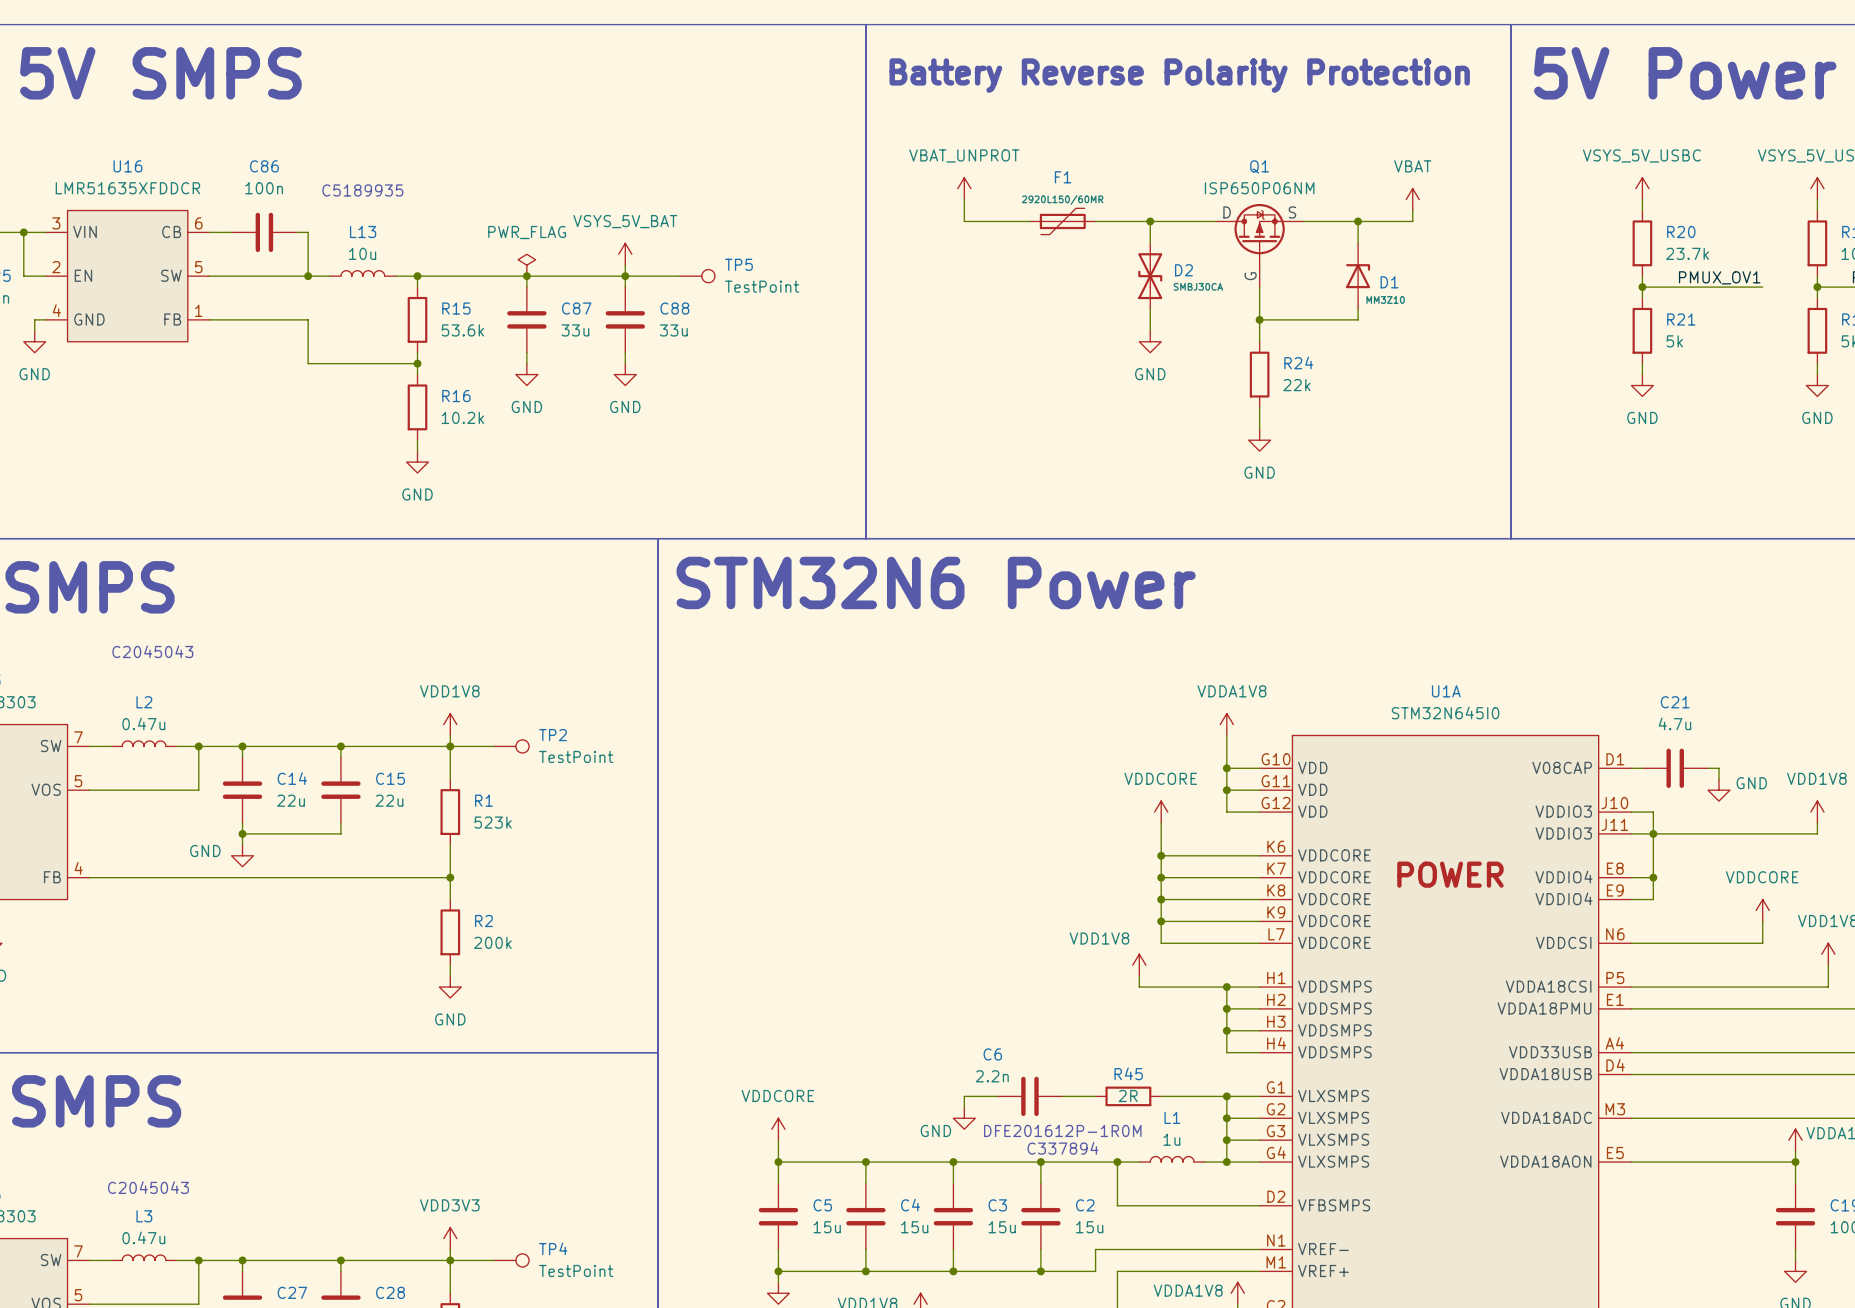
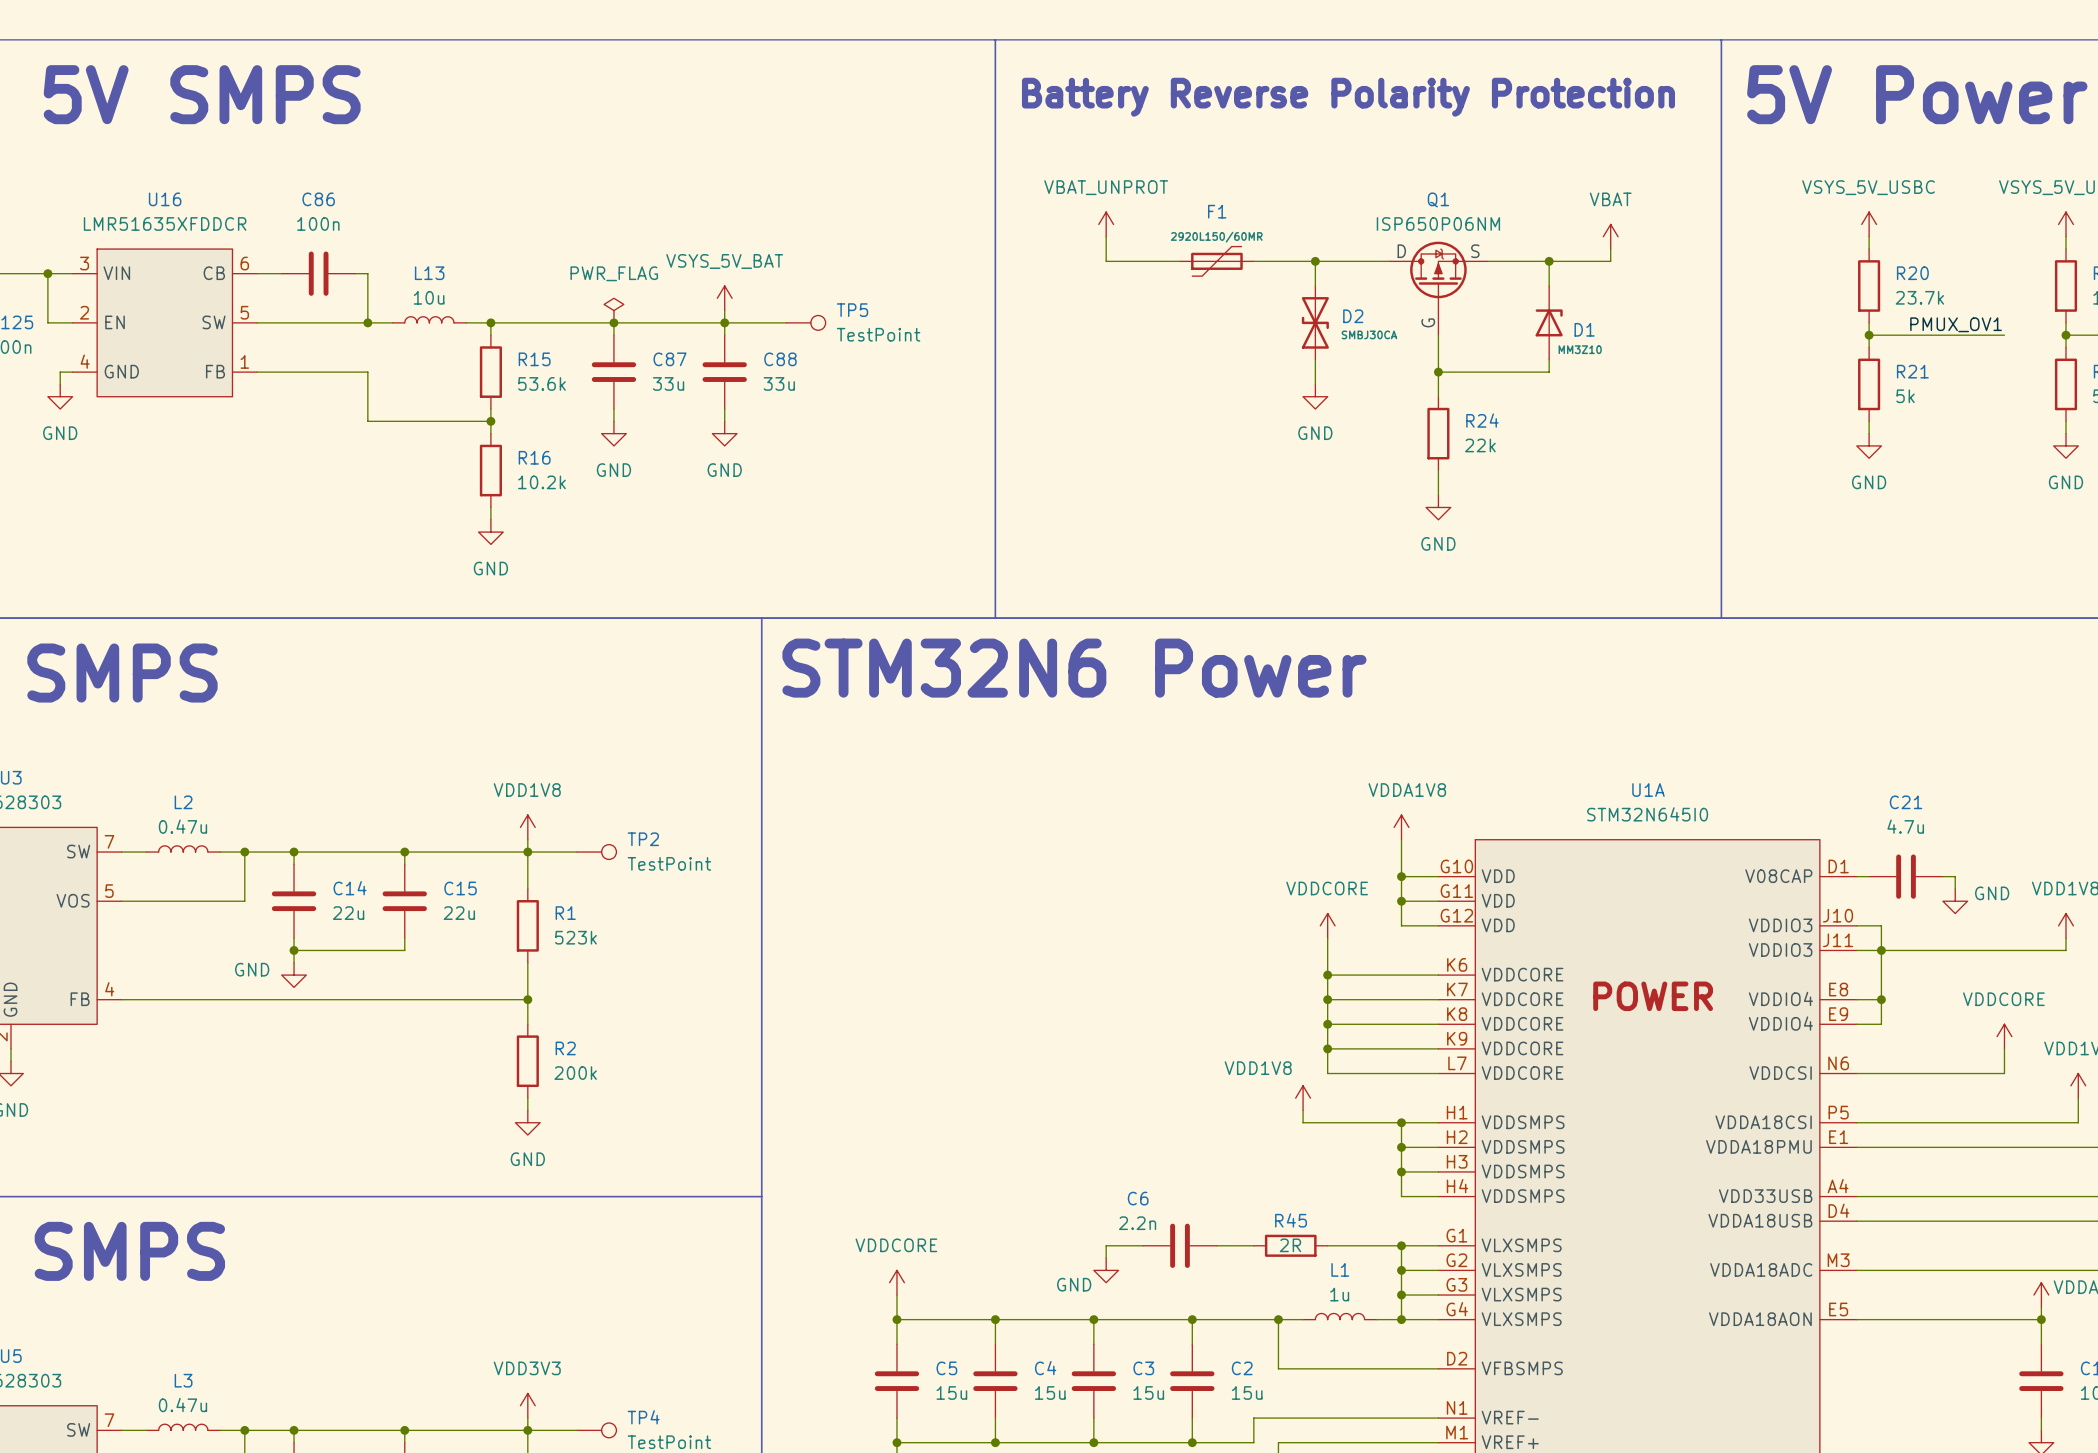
text: C5189935 (362, 190) -> none
text: C2045043 (152, 651) -> none
text: DFE201612P-1R0M (1062, 1130) -> none
text: C337894 (1063, 1148) -> none
text: C2045043 (148, 1187) -> none

